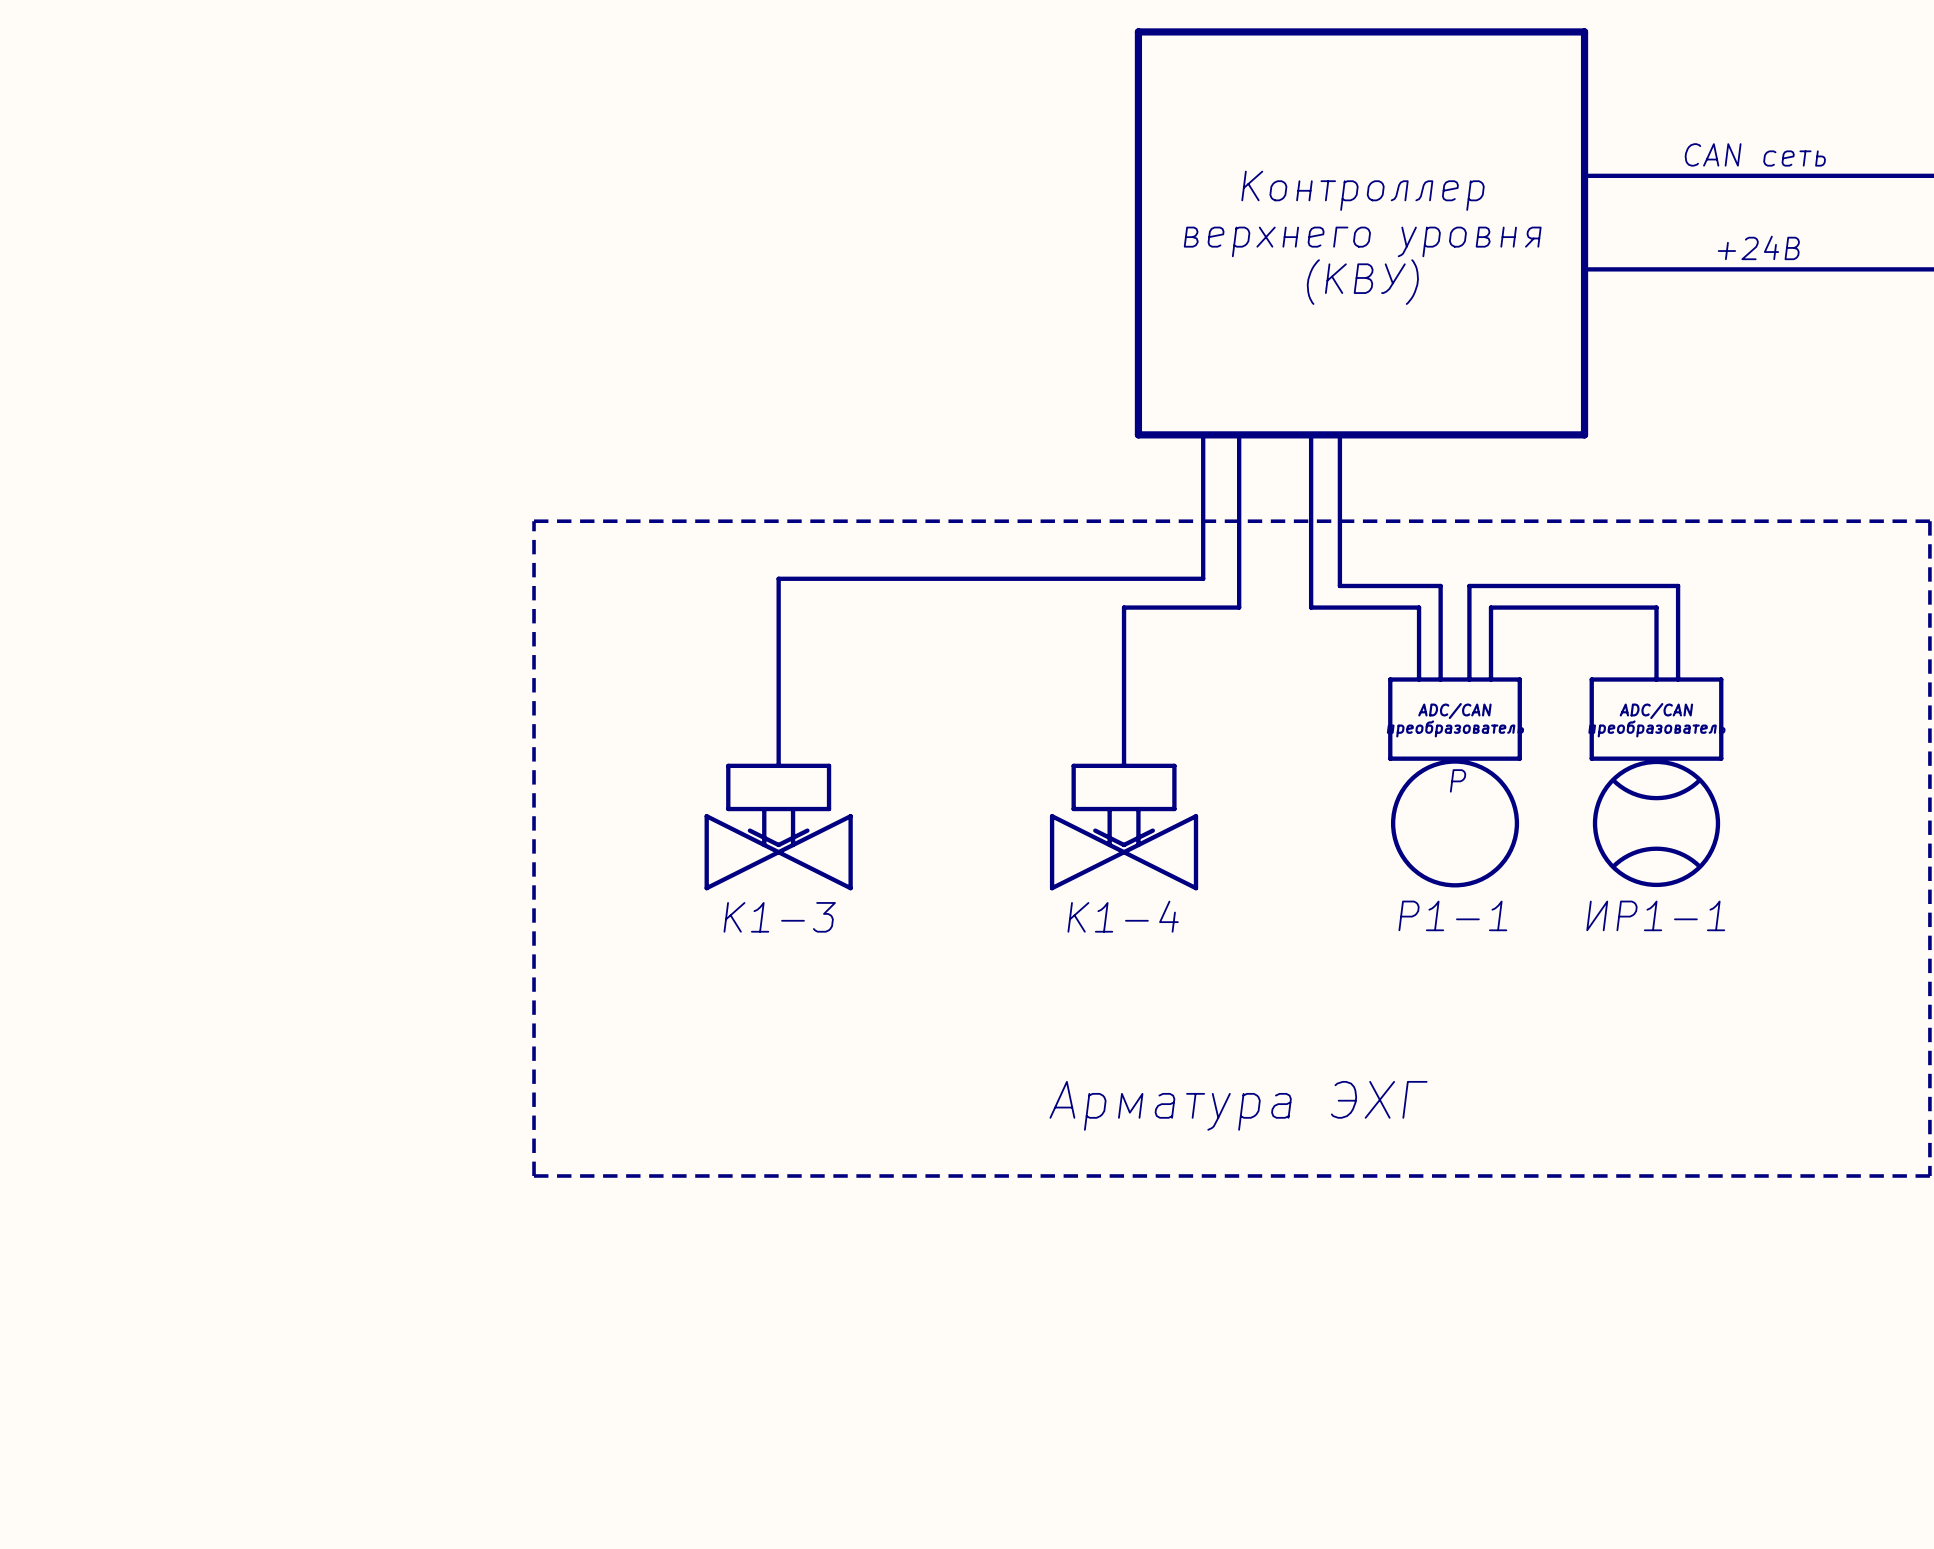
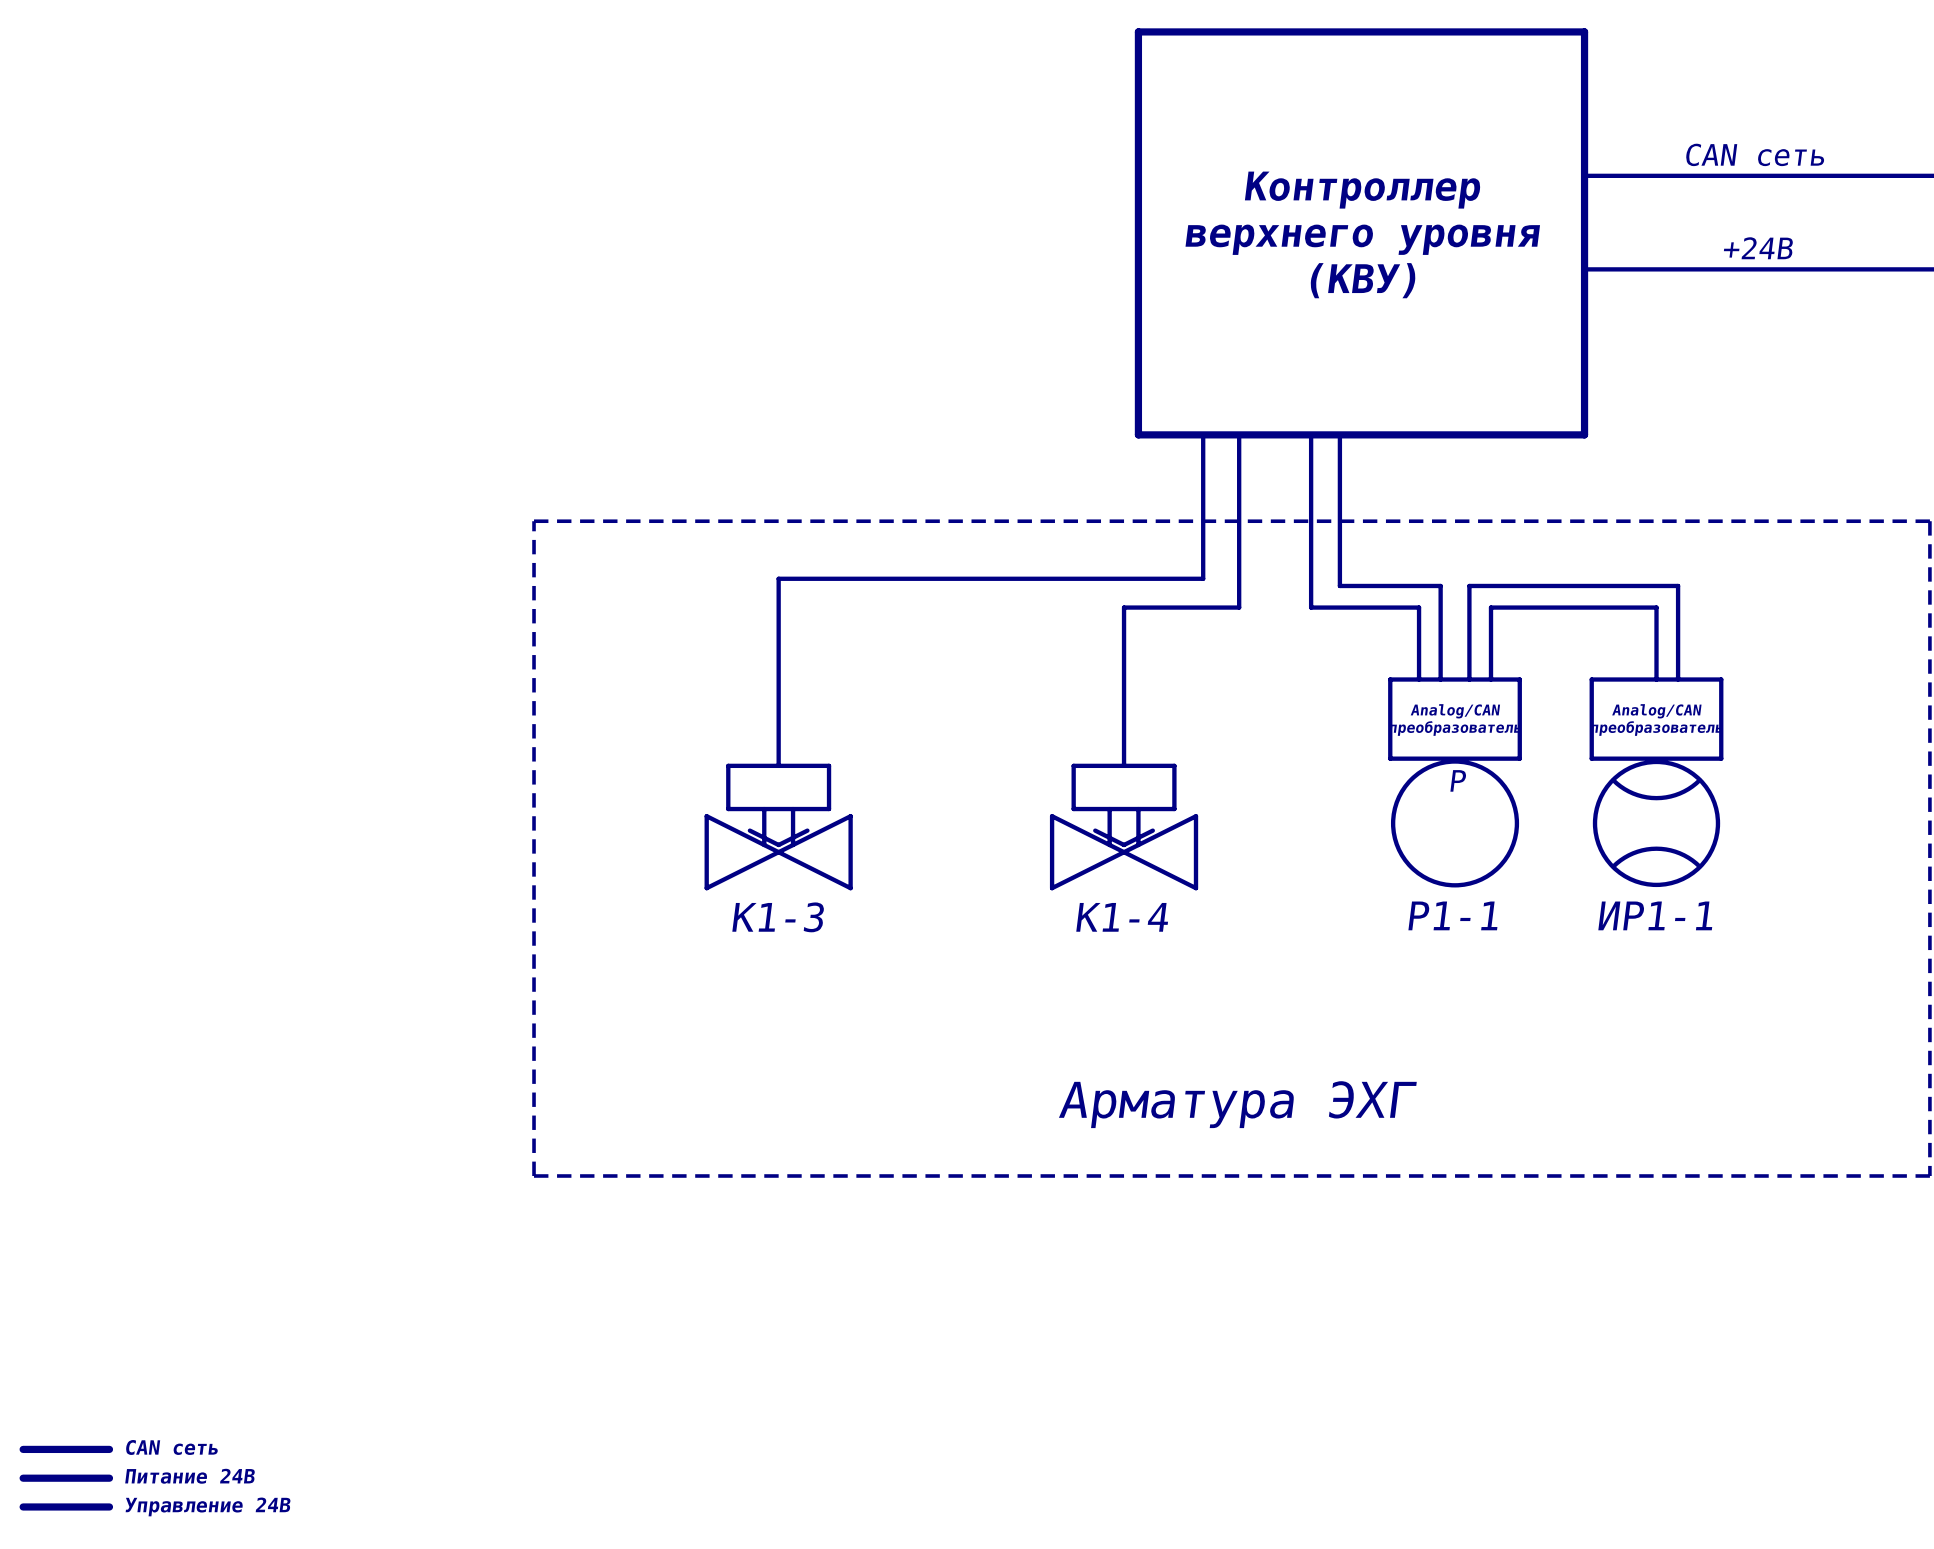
text: ADC/CAN (1454, 711) -> Analog/CAN (1455, 711)
text: ADC/CAN (1656, 711) -> Analog/CAN (1656, 711)
text: none -> CAN сеть (171, 1447)
line: none -> (23, 1449) (109, 1449)
text: none -> Питание 24В (190, 1476)
line: none -> (23, 1478) (109, 1478)
line: none -> (23, 1506) (109, 1506)
text: none -> Управление 24В (208, 1506)

